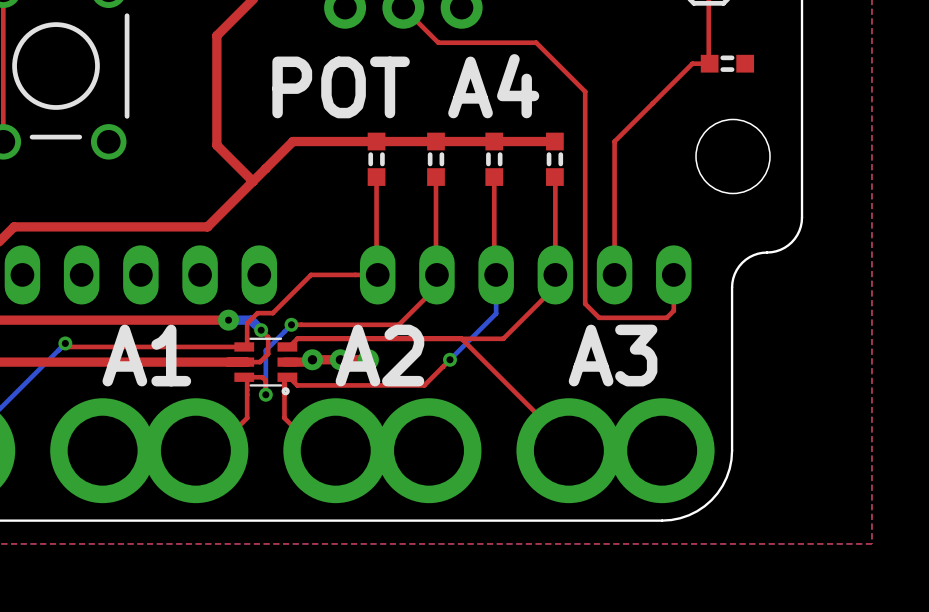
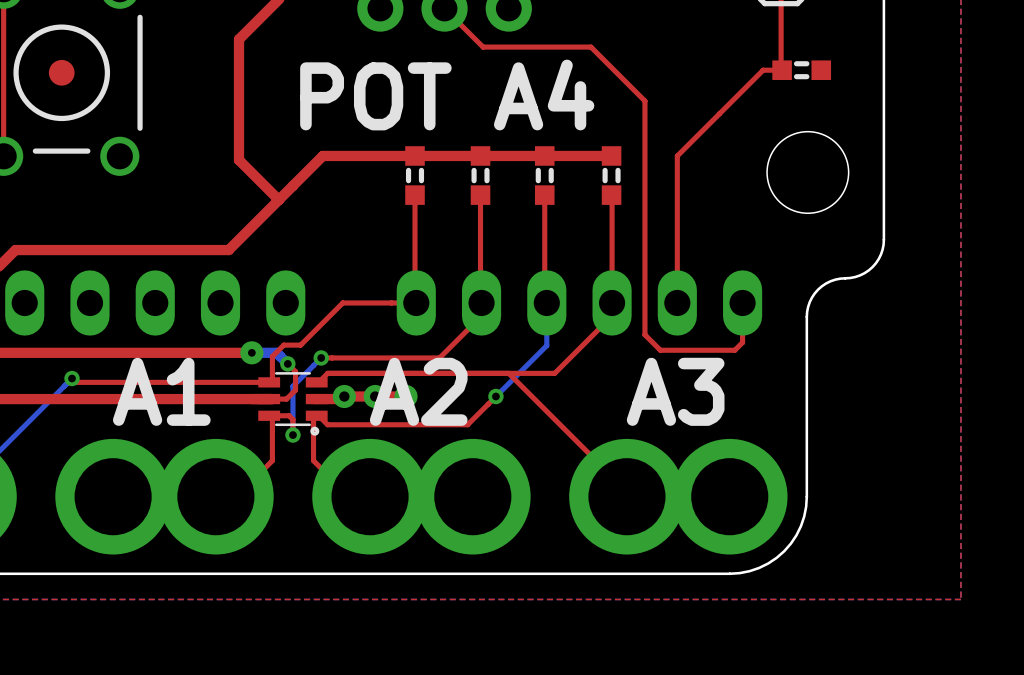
part: none -> (61, 72)

